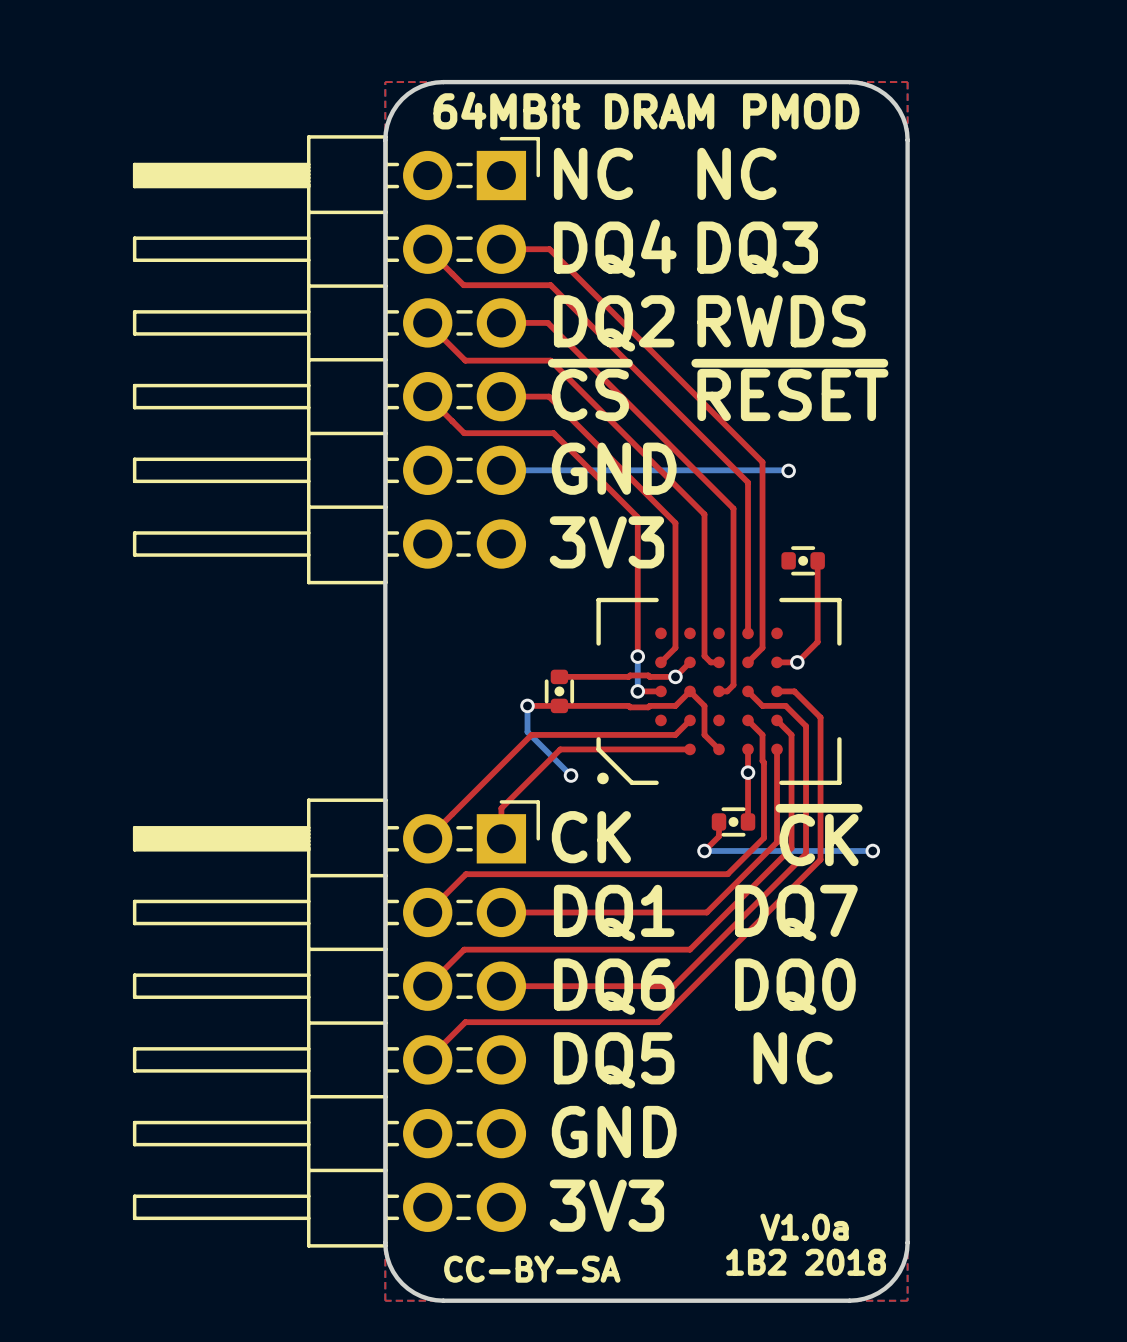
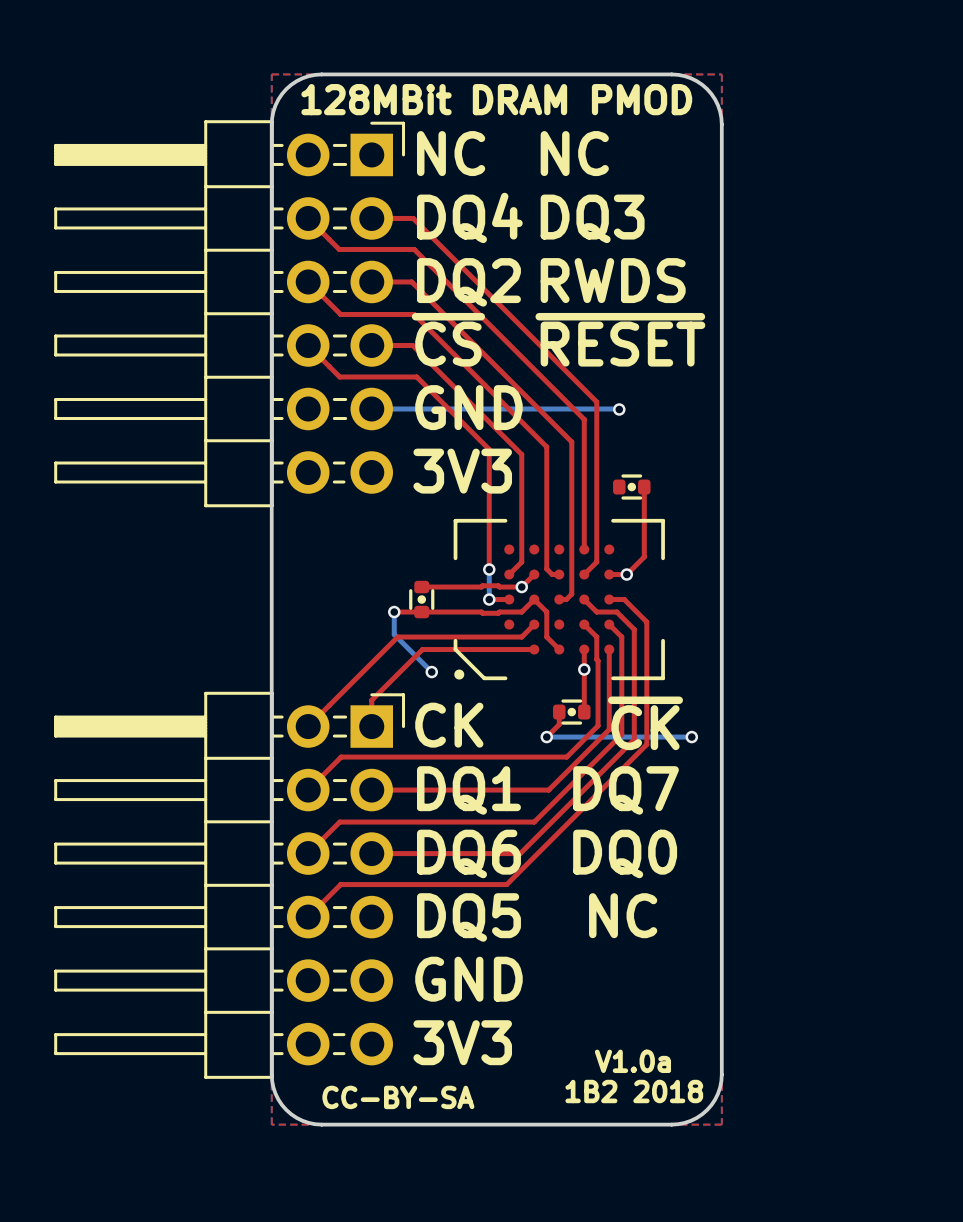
text: 64MBit DRAM PMOD (646, 110) -> 128MBit DRAM PMOD (496, 99)

